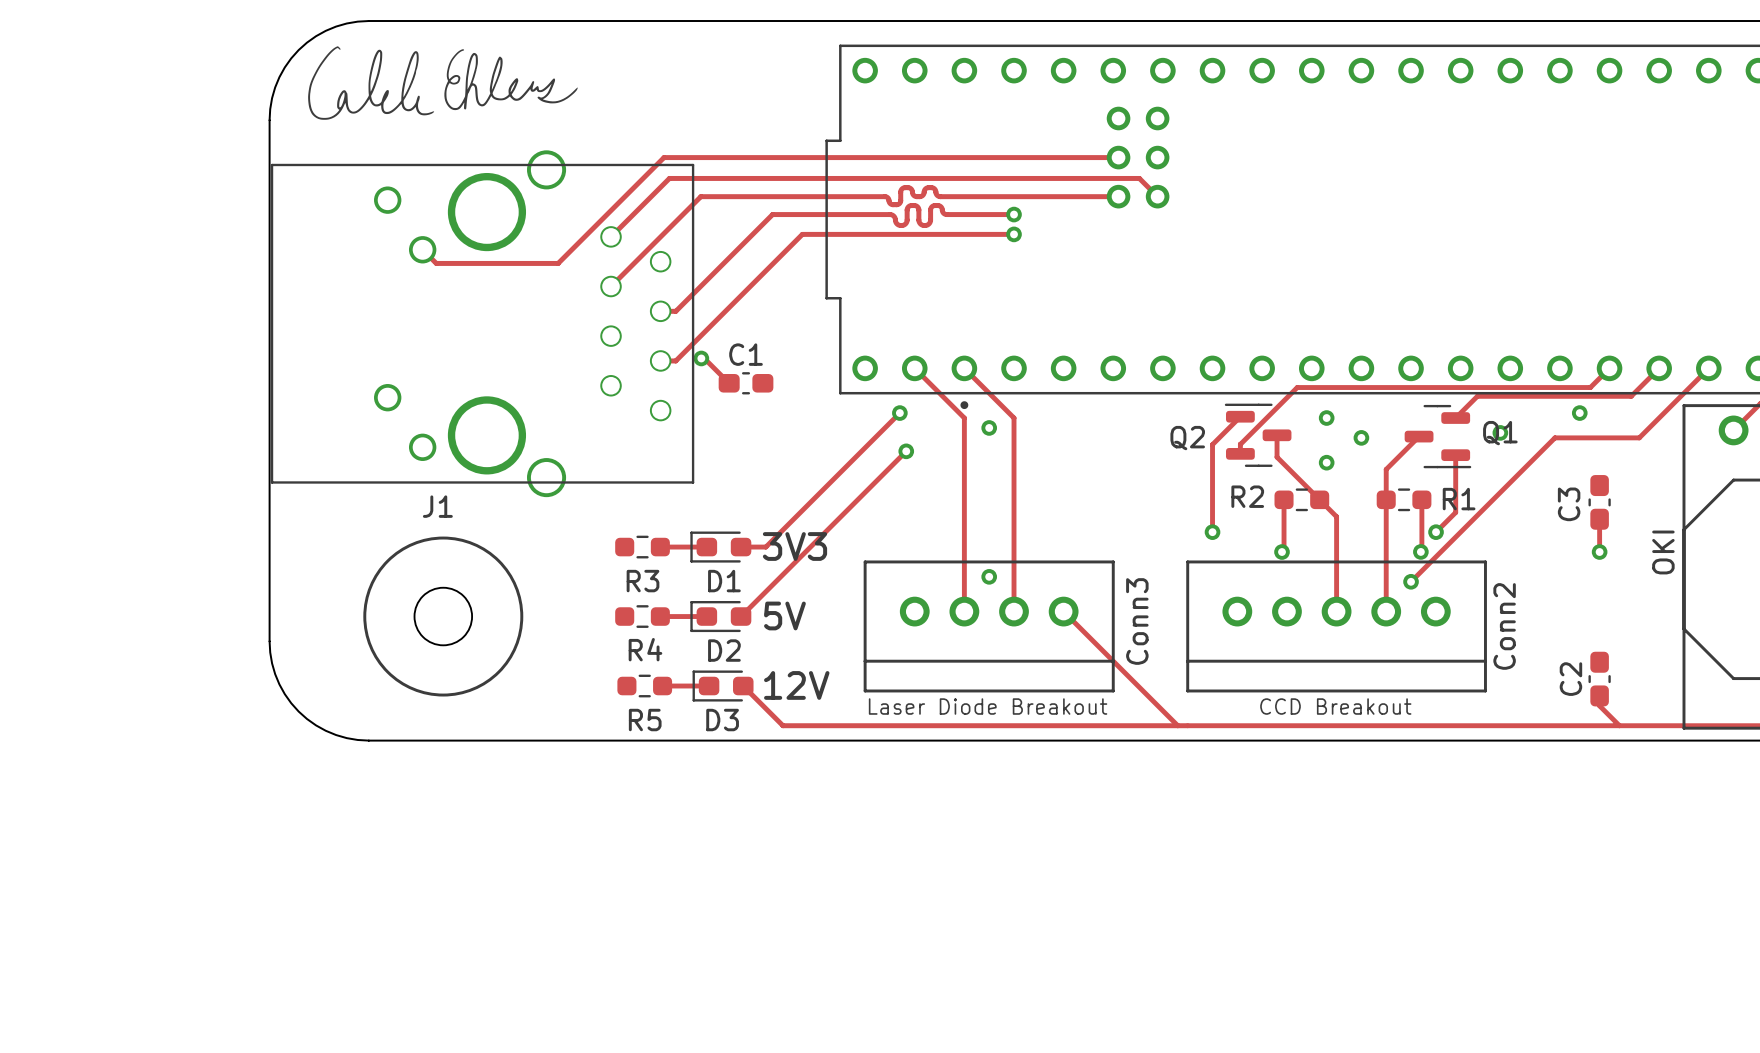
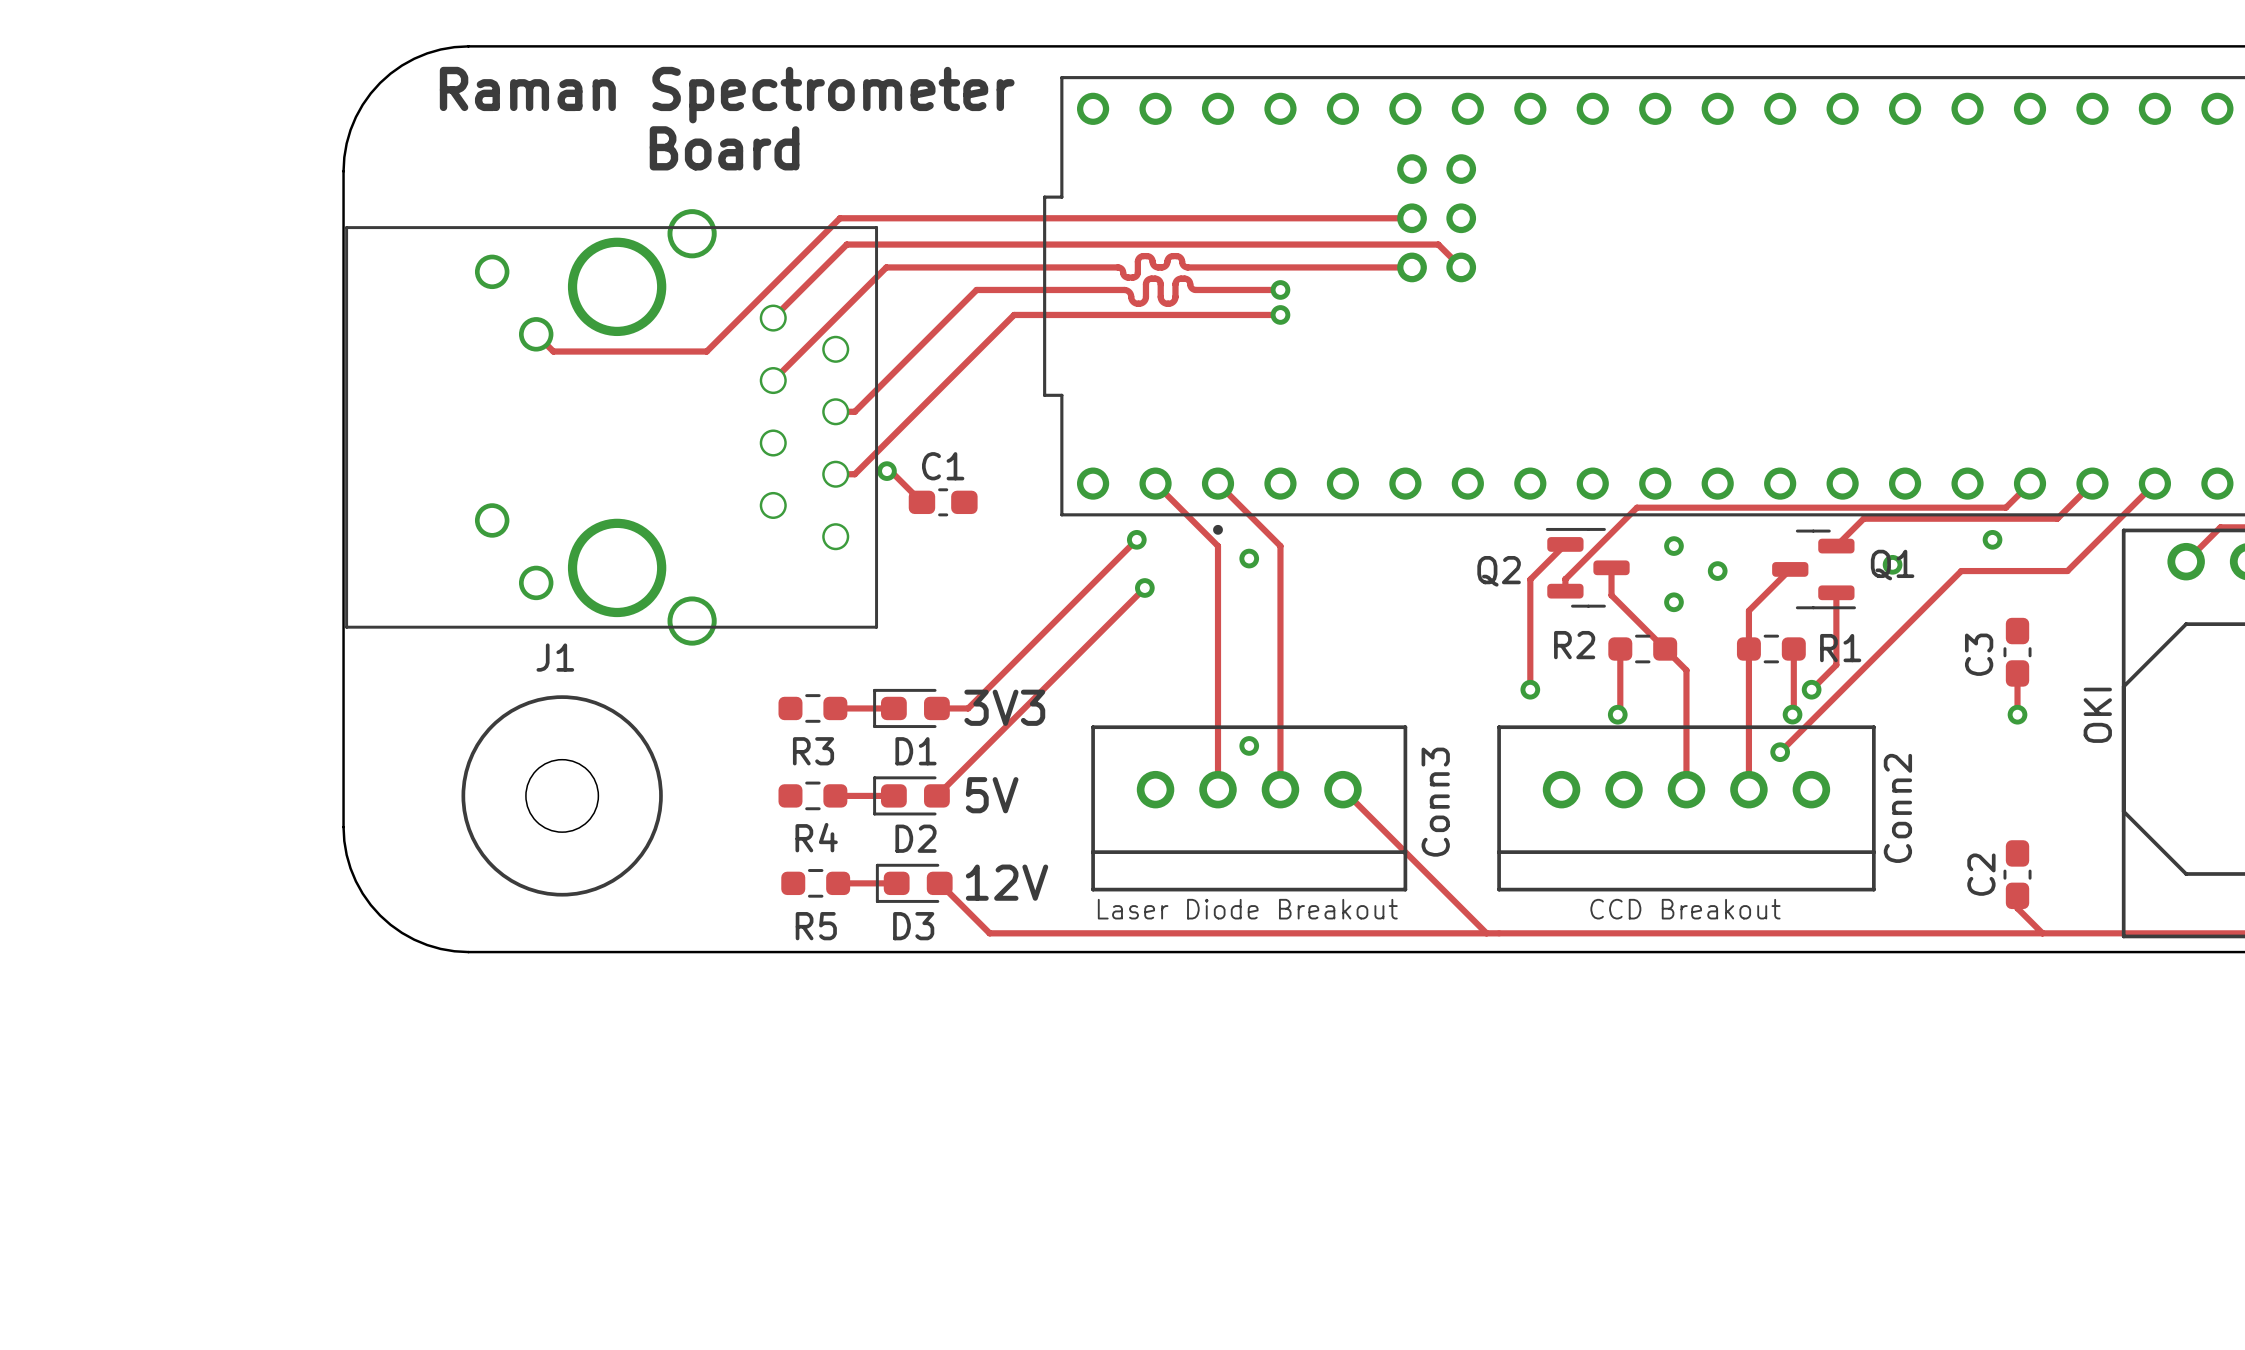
drawing: [308, 46, 578, 120] -> none
text: none -> Raman Spectrometer (727, 95)
text: none -> Board (724, 148)

